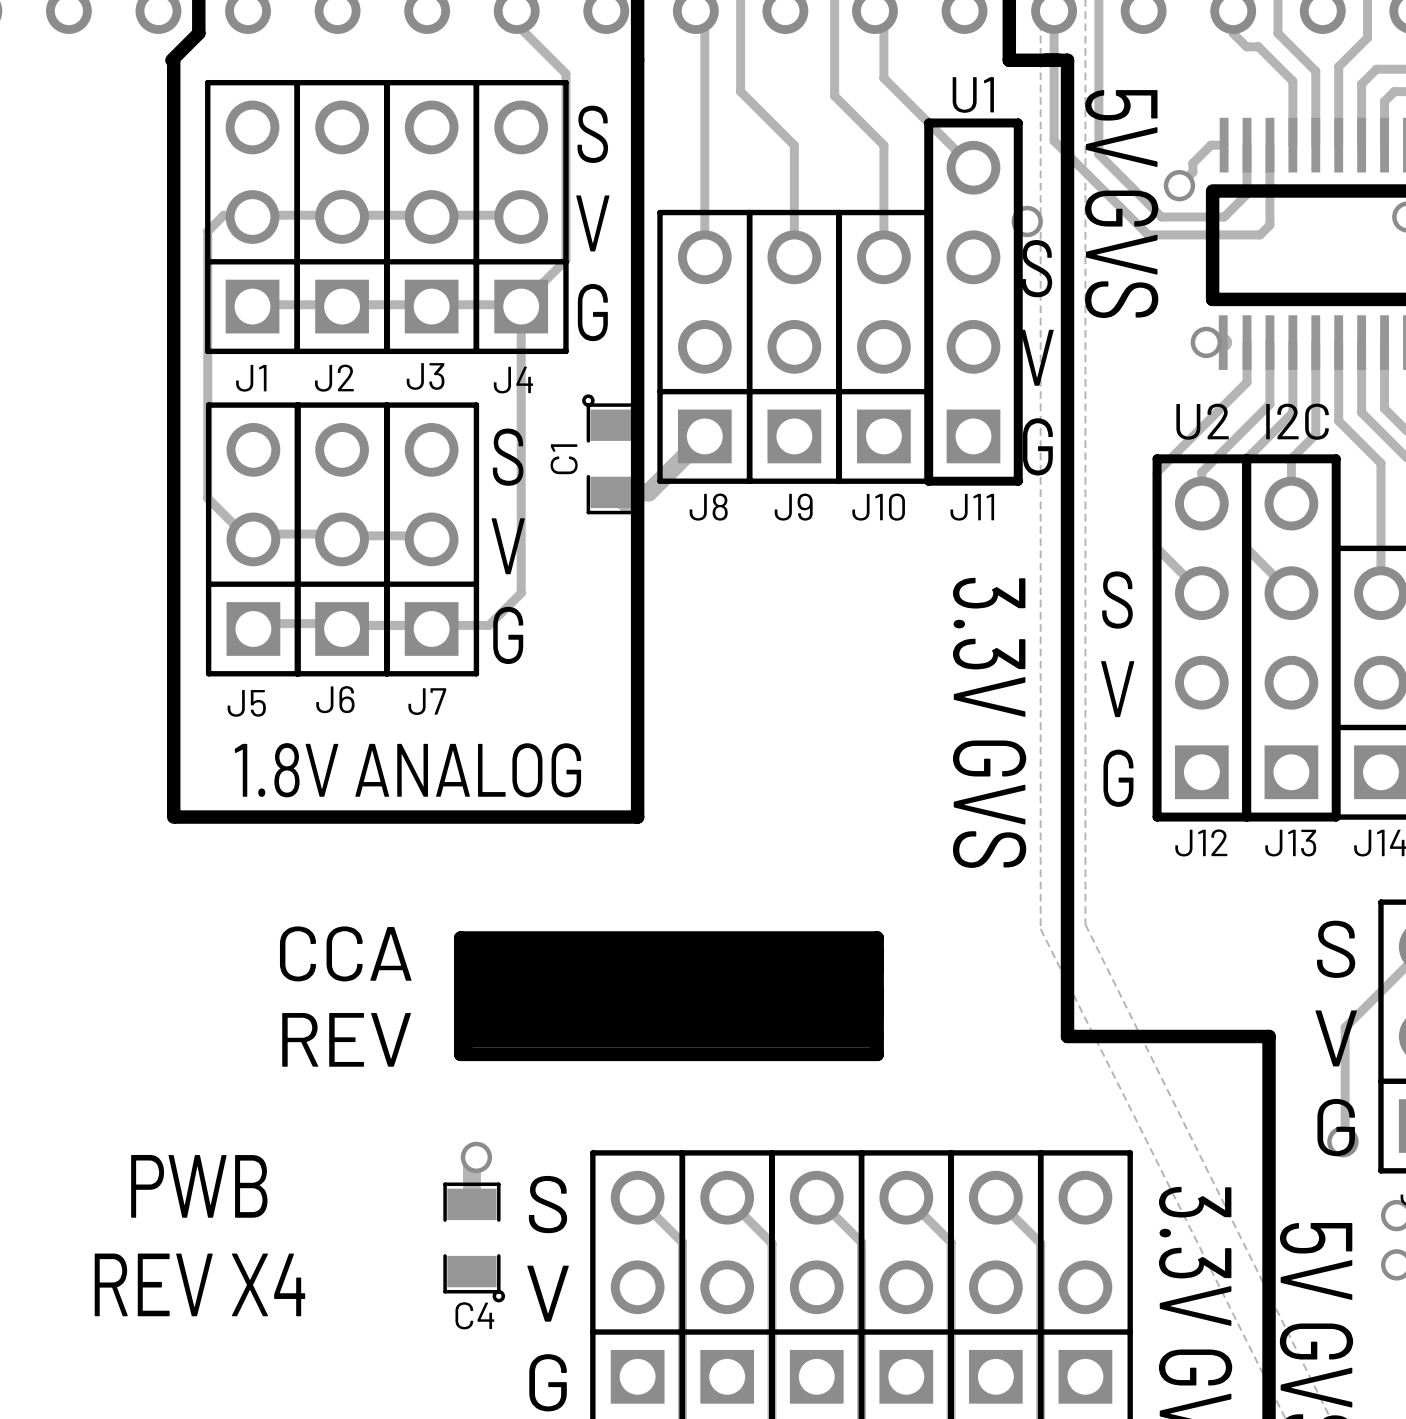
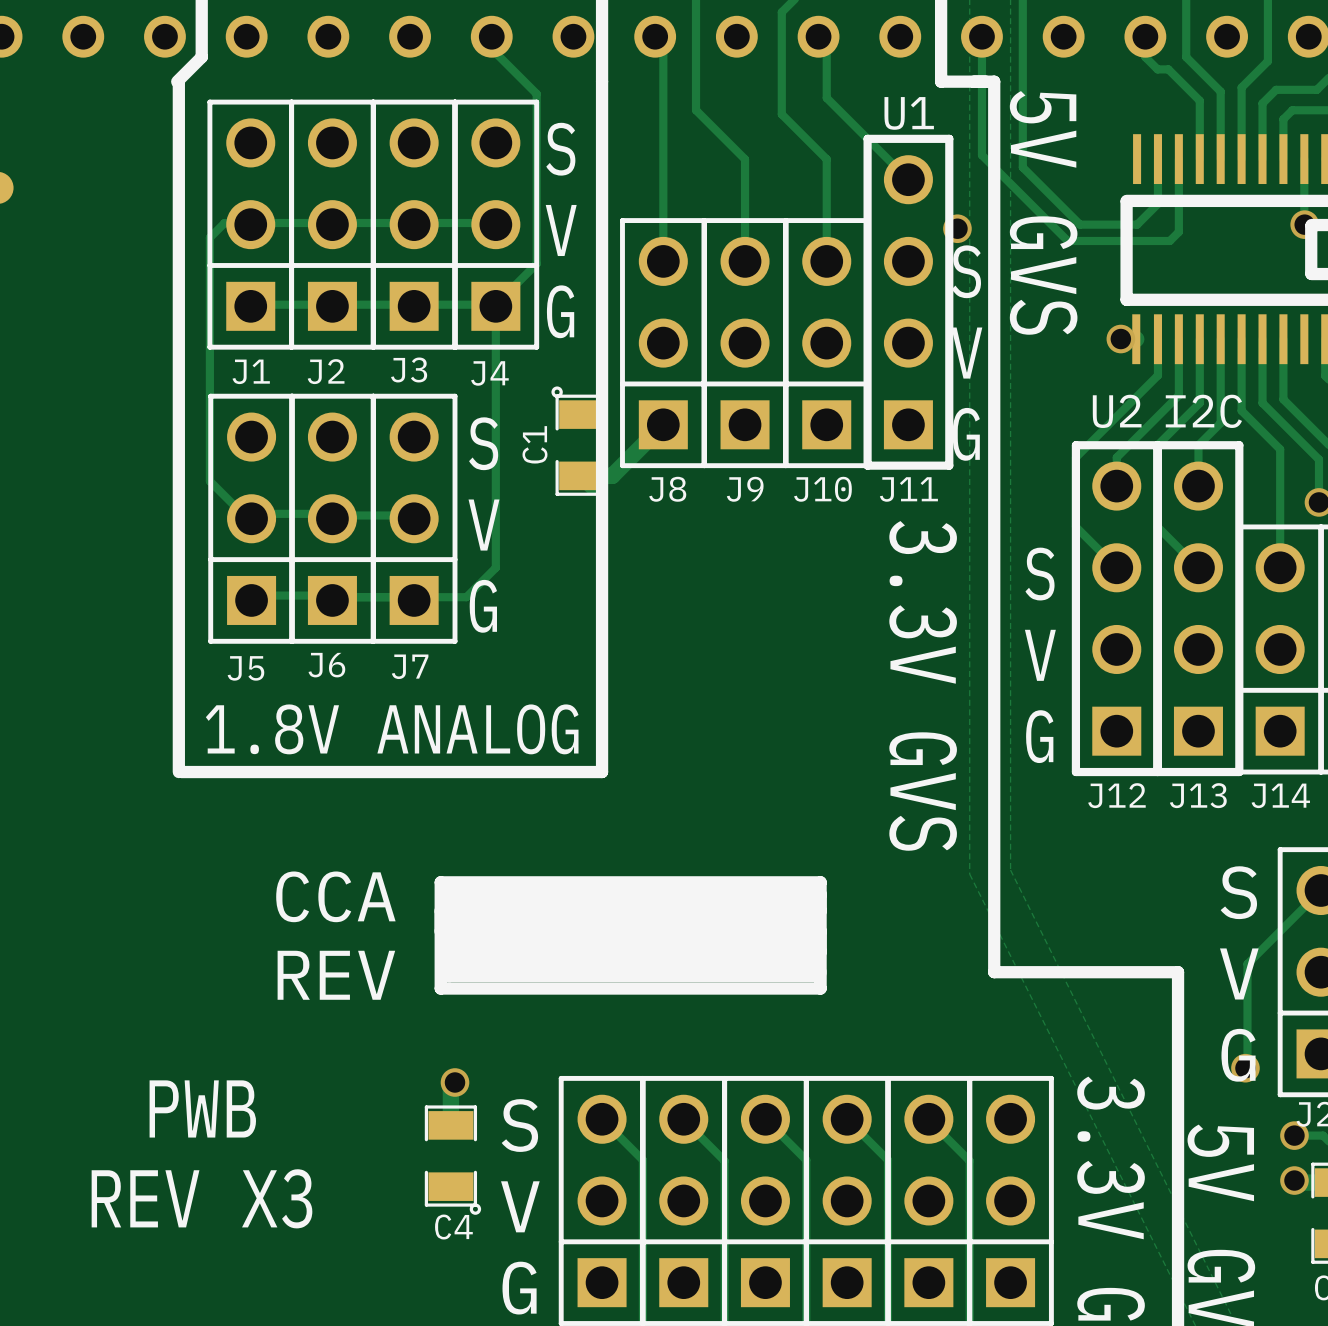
track: (1224, 145) (1211, 145) (1192, 163) (1192, 172) (1179, 185) -> none
via: (1179, 185) -> none
text: REV X4 (199, 1284) -> REV X3 (201, 1198)

